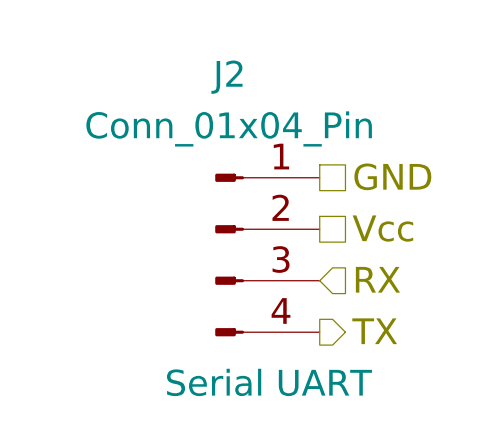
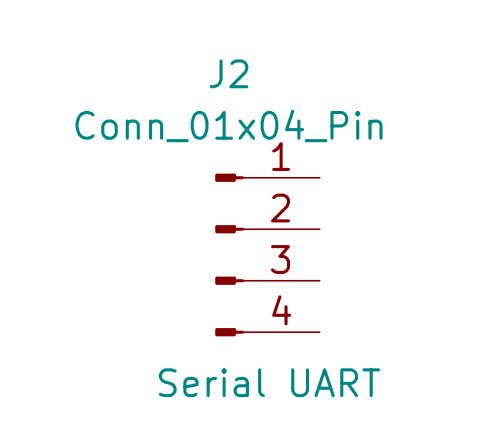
hierarchical label: GND (392, 176) -> none
hierarchical label: Vcc (382, 228) -> none
hierarchical label: RX (377, 279) -> none
hierarchical label: TX (374, 331) -> none

